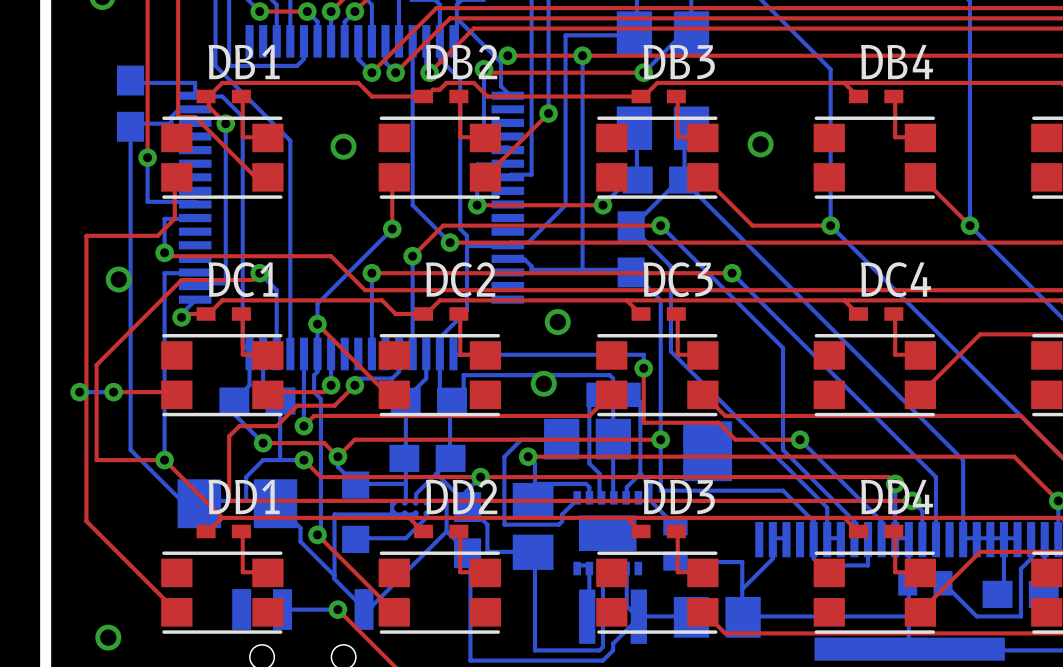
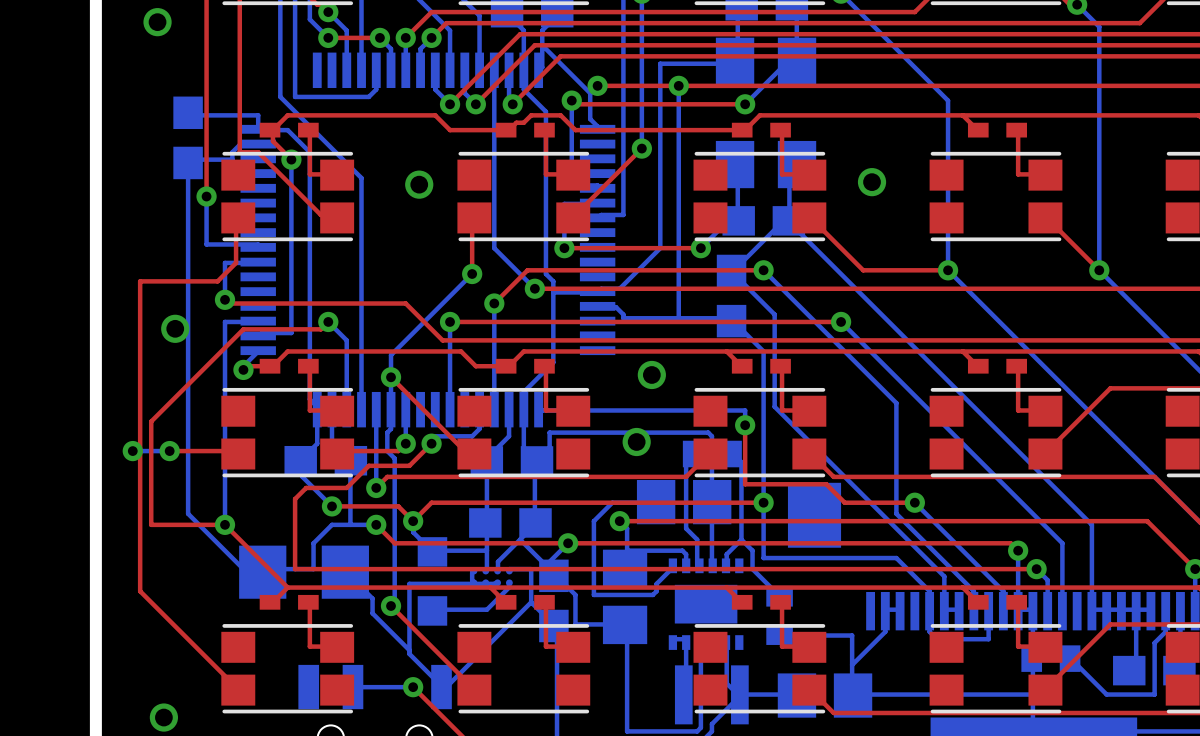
DB1 name: DB1 (244, 61) -> none
DB4 name: DB4 (897, 61) -> none
DB2 name: DB2 (461, 62) -> none
DB3 name: DB3 (679, 62) -> none
DC1 name: DC1 (243, 279) -> none
DC2 name: DC2 (460, 279) -> none
DC3 name: DC3 (678, 279) -> none
DC4 name: DC4 (896, 279) -> none
DD1 name: DD1 (244, 496) -> none
DD2 name: DD2 (461, 496) -> none
DD4 name: DD4 (897, 496) -> none
DD3 name: DD3 (679, 497) -> none

